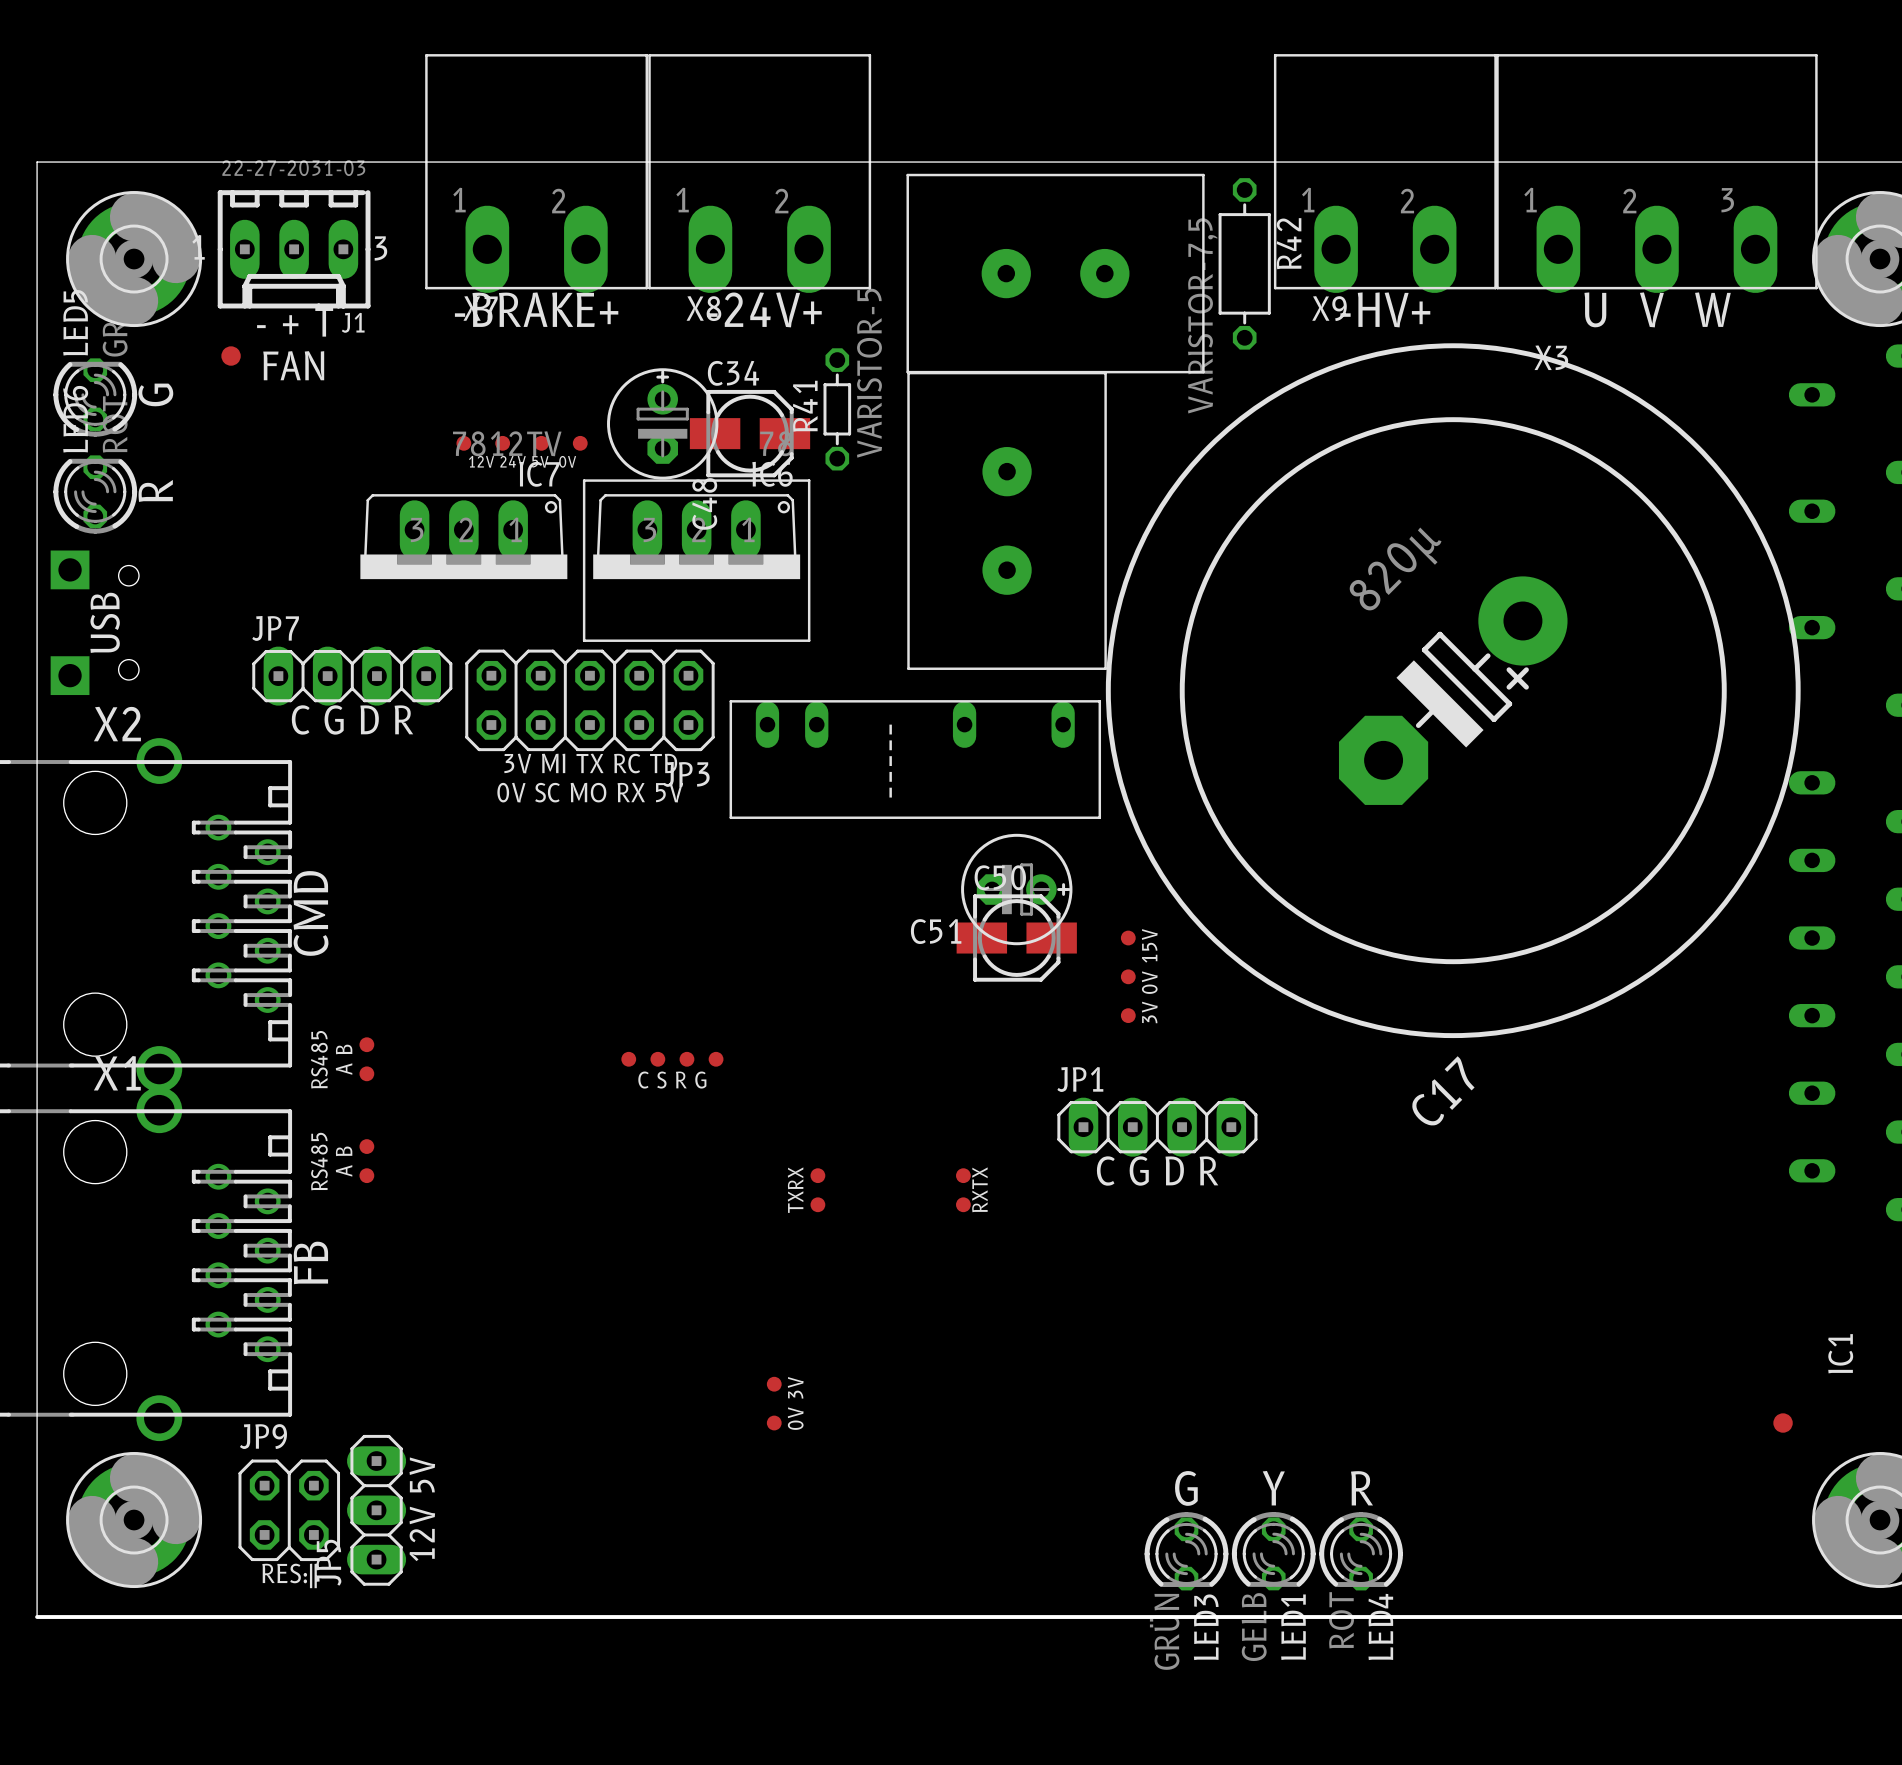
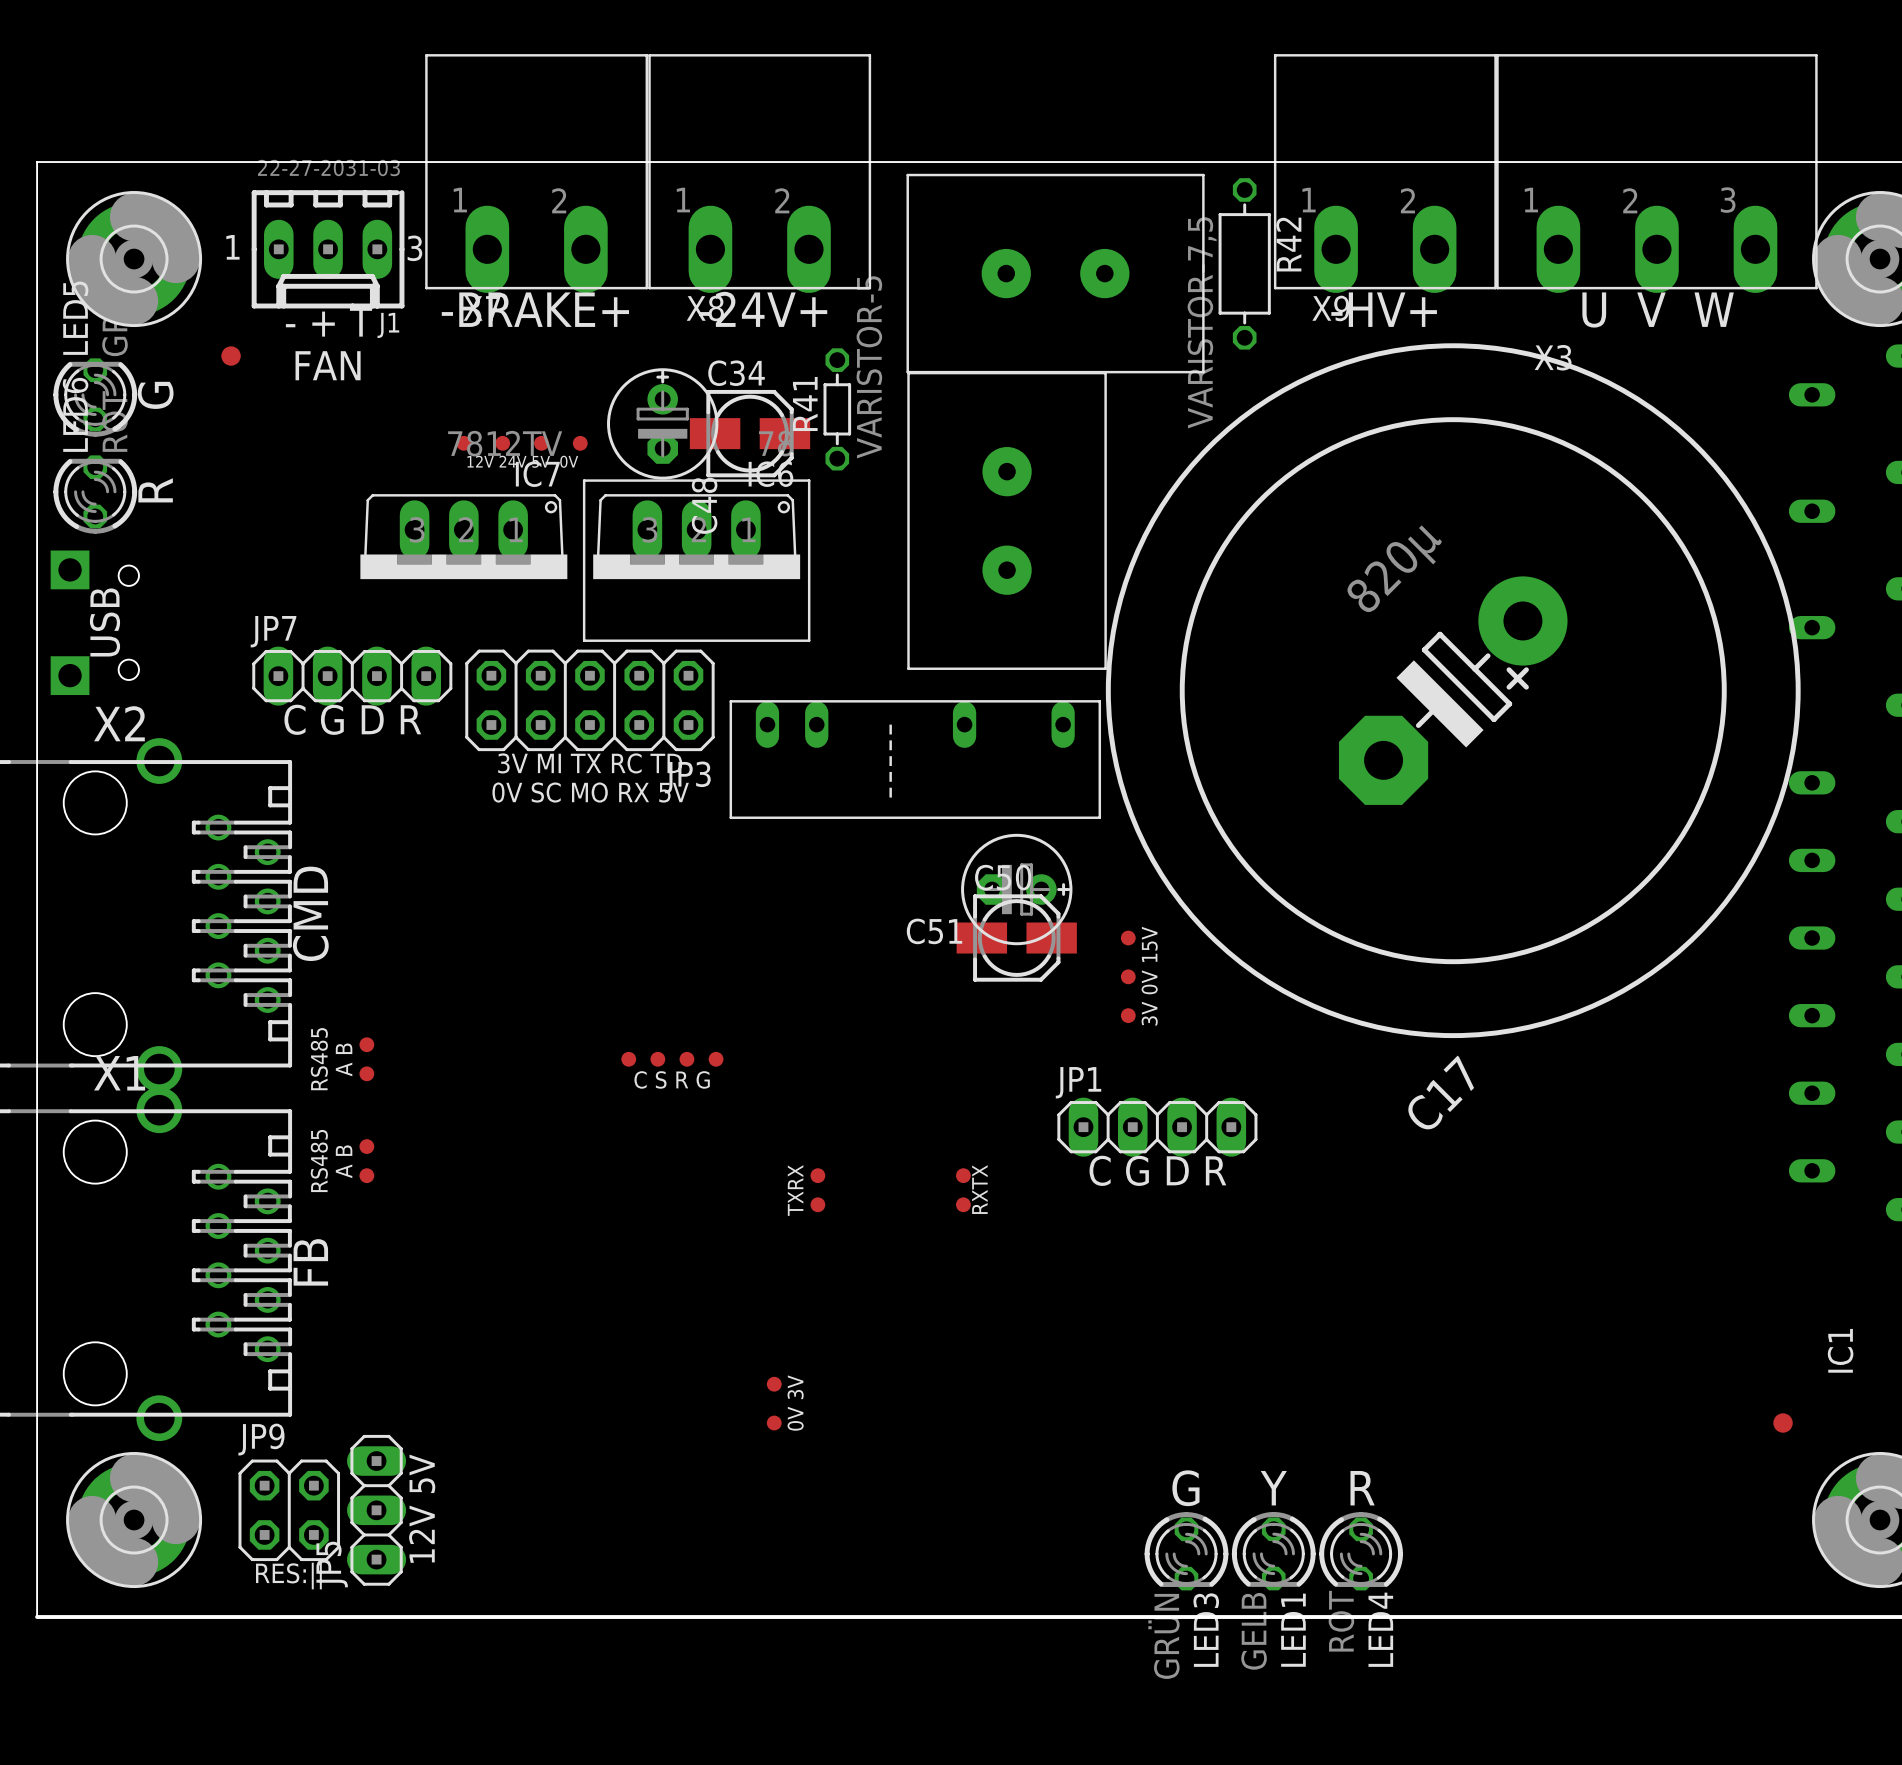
J1 position: (294, 249) -> (328, 249)
text position: - + T (295, 322) -> - + T (328, 322)
text position: FAN (293, 365) -> FAN (328, 365)

